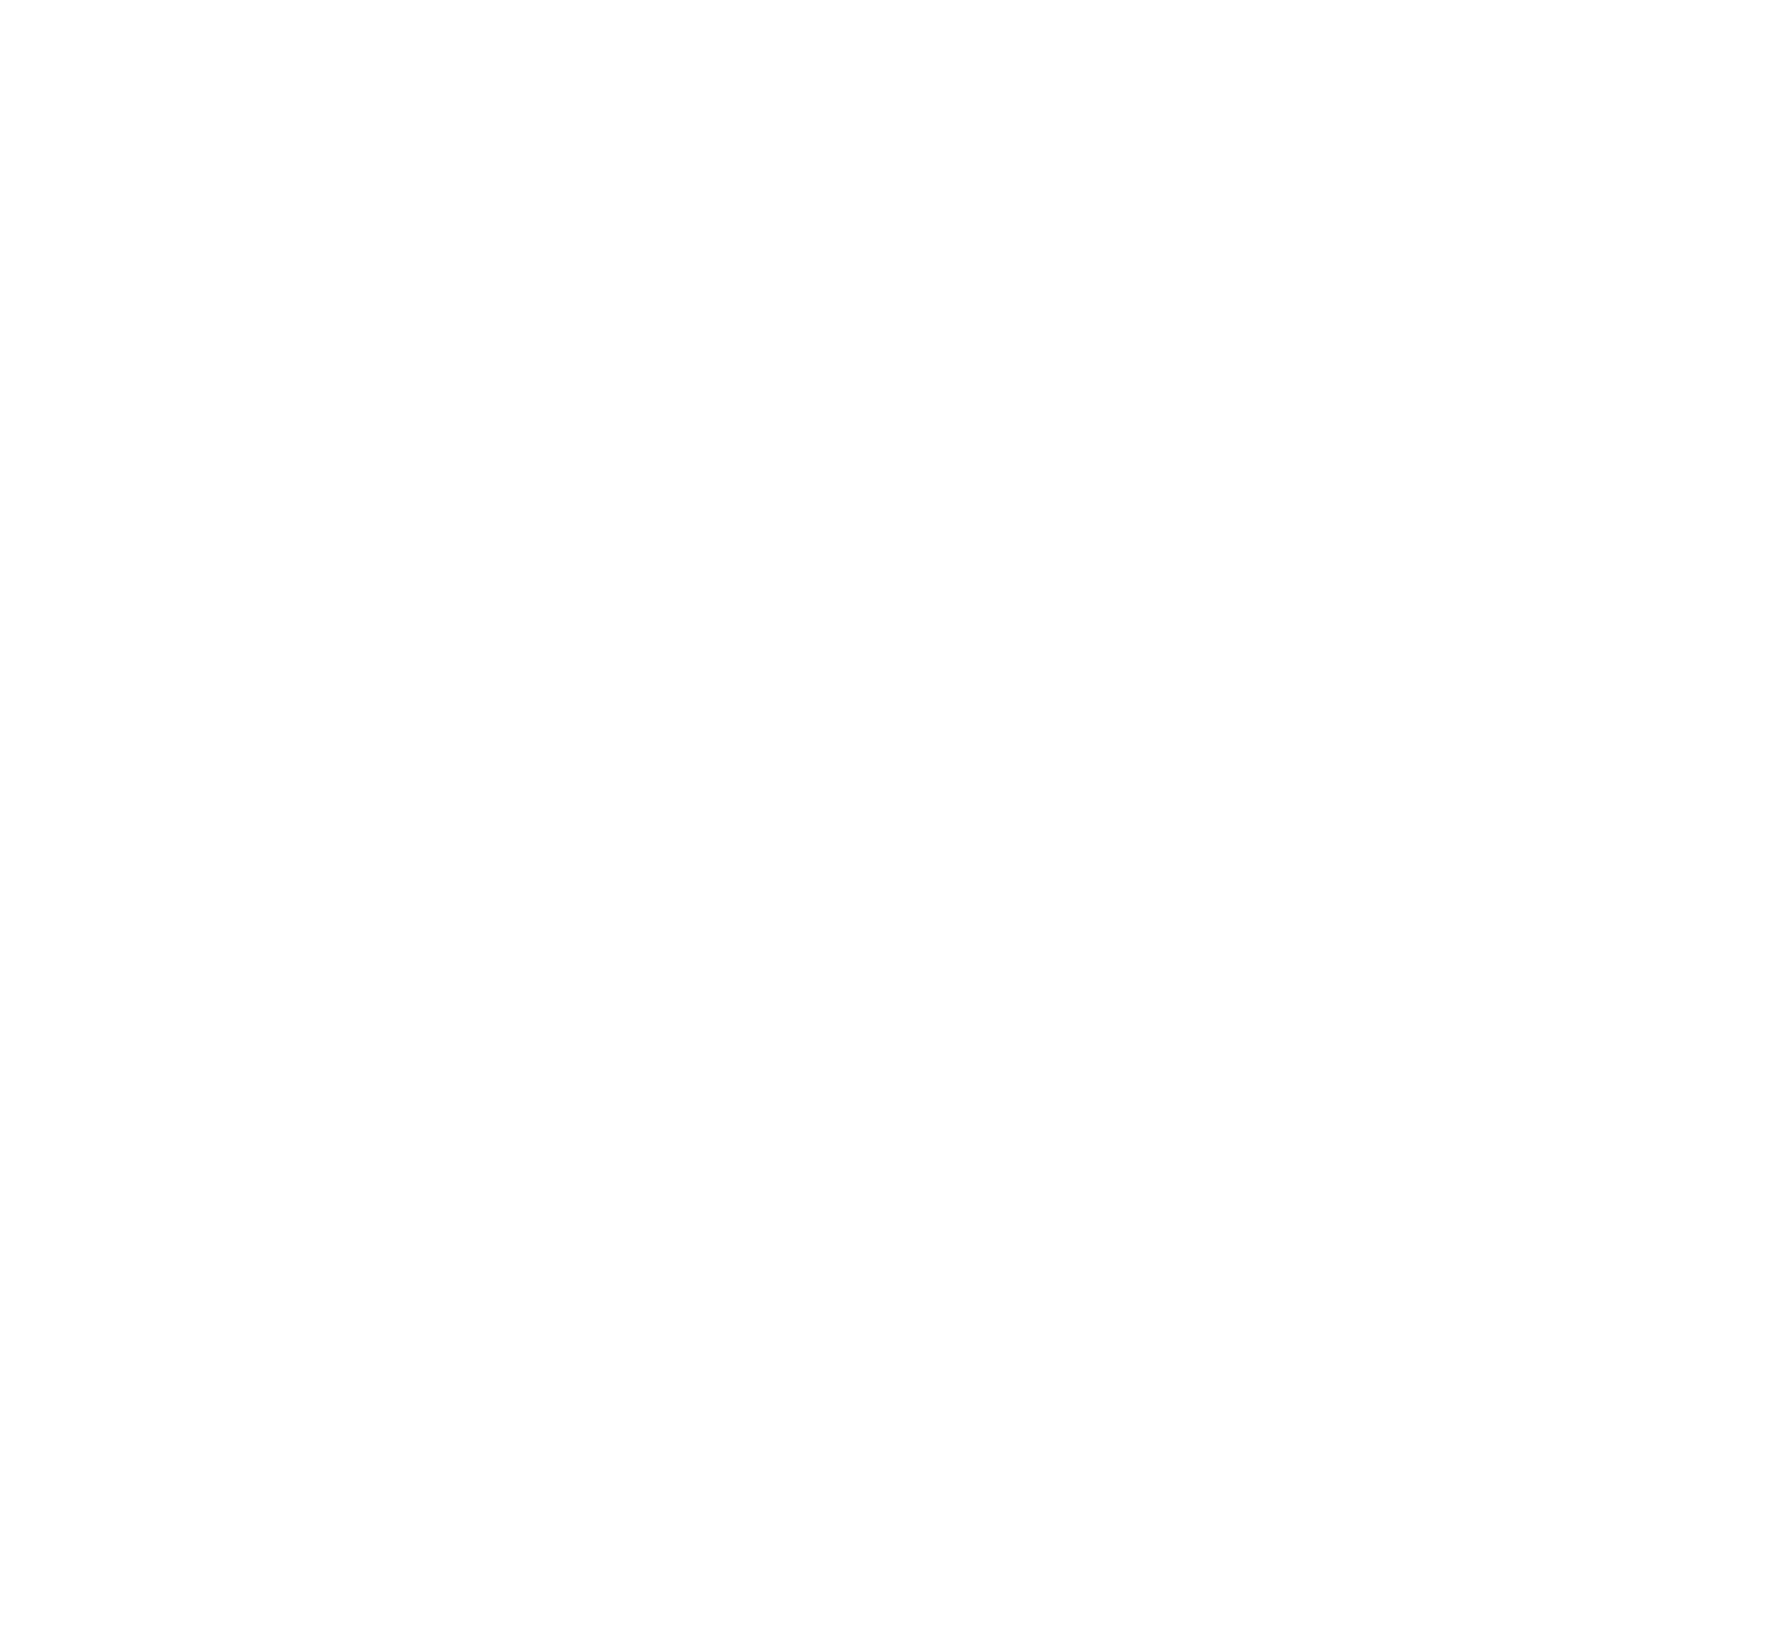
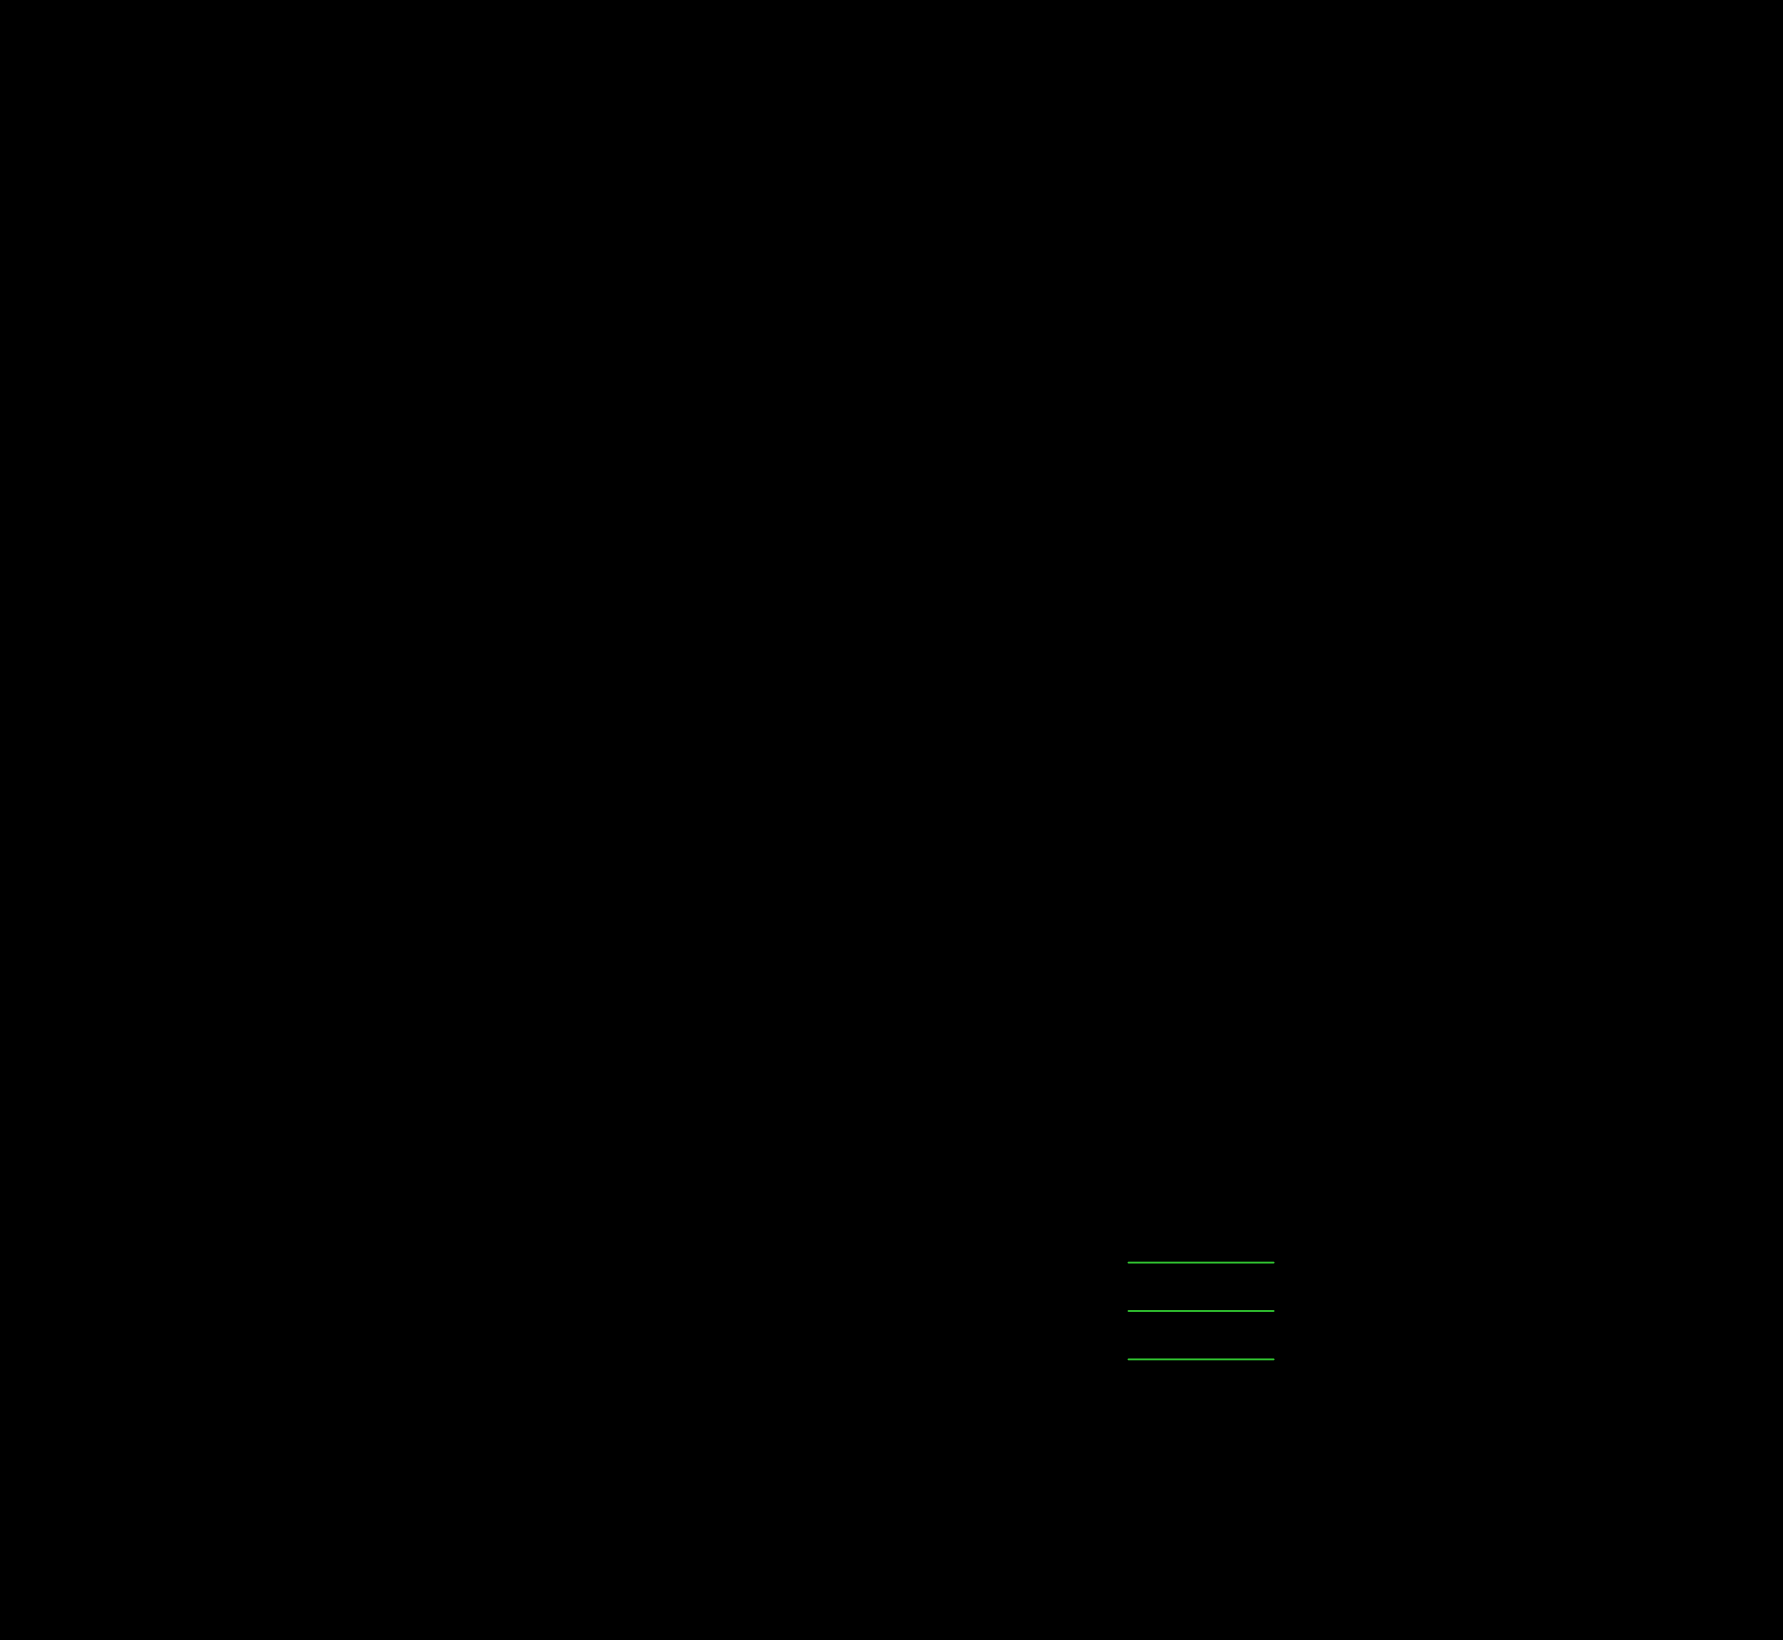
wire: none -> (1128, 1262) (1273, 1262)
wire: none -> (1128, 1310) (1273, 1310)
wire: none -> (1128, 1359) (1273, 1359)

